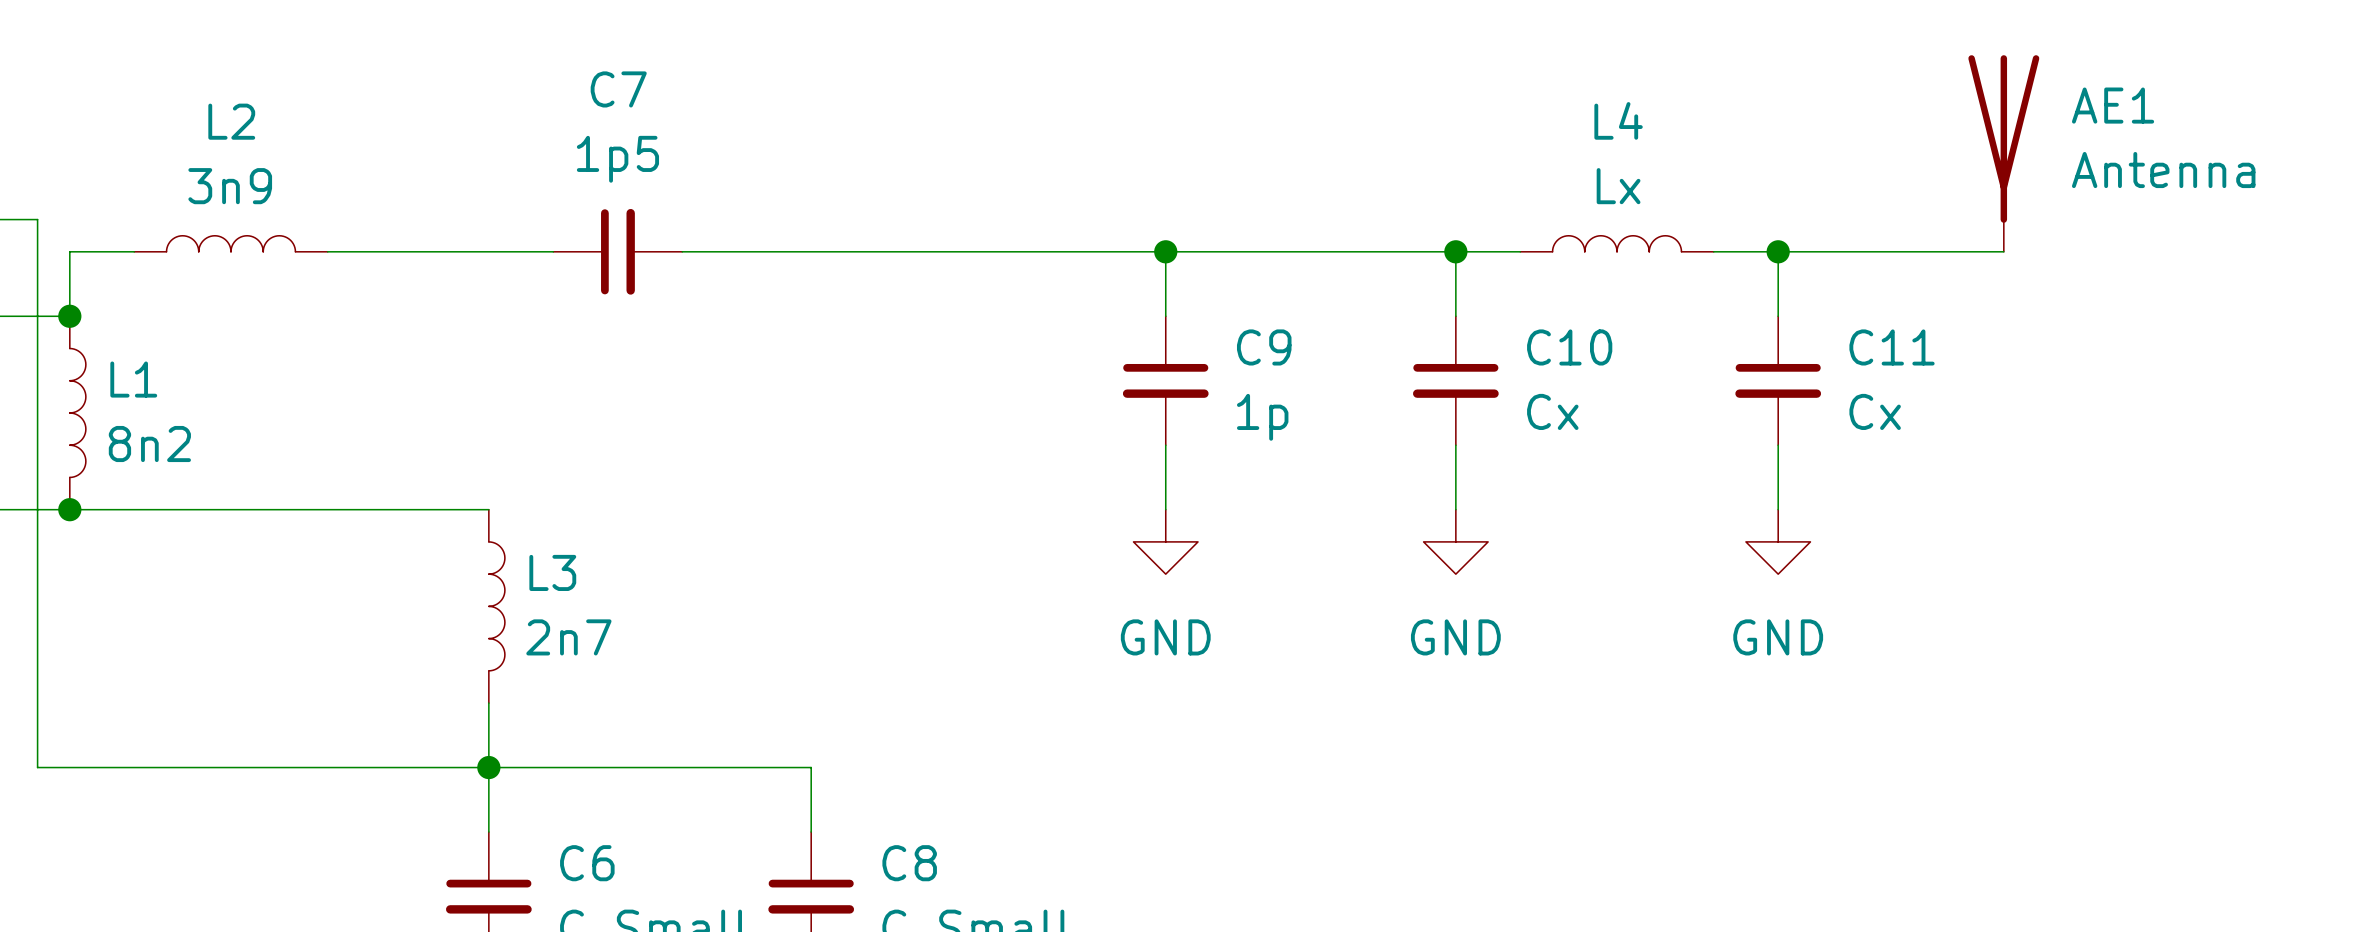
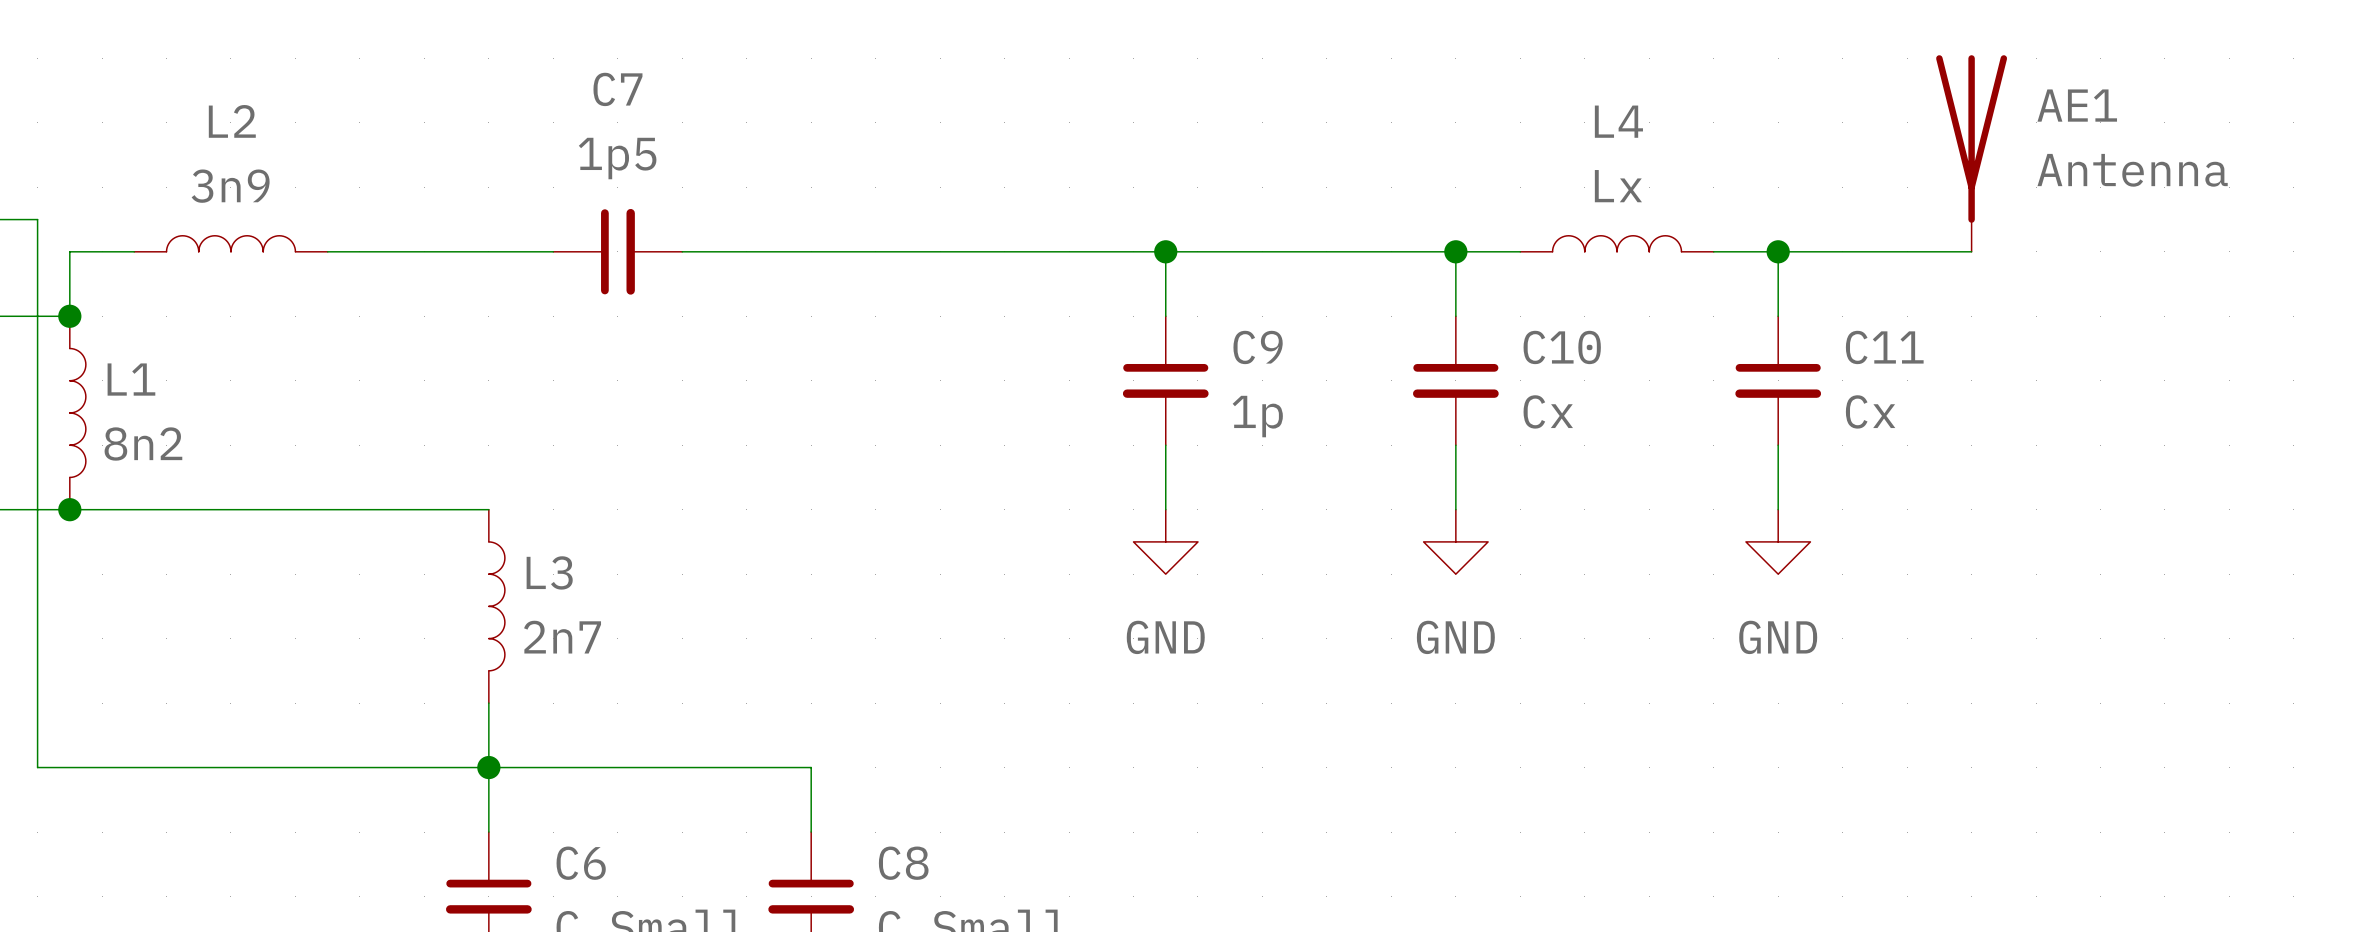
AE1 position: (2003, 153) -> (1971, 153)
wire: (1971, 251) (2003, 251) -> none

